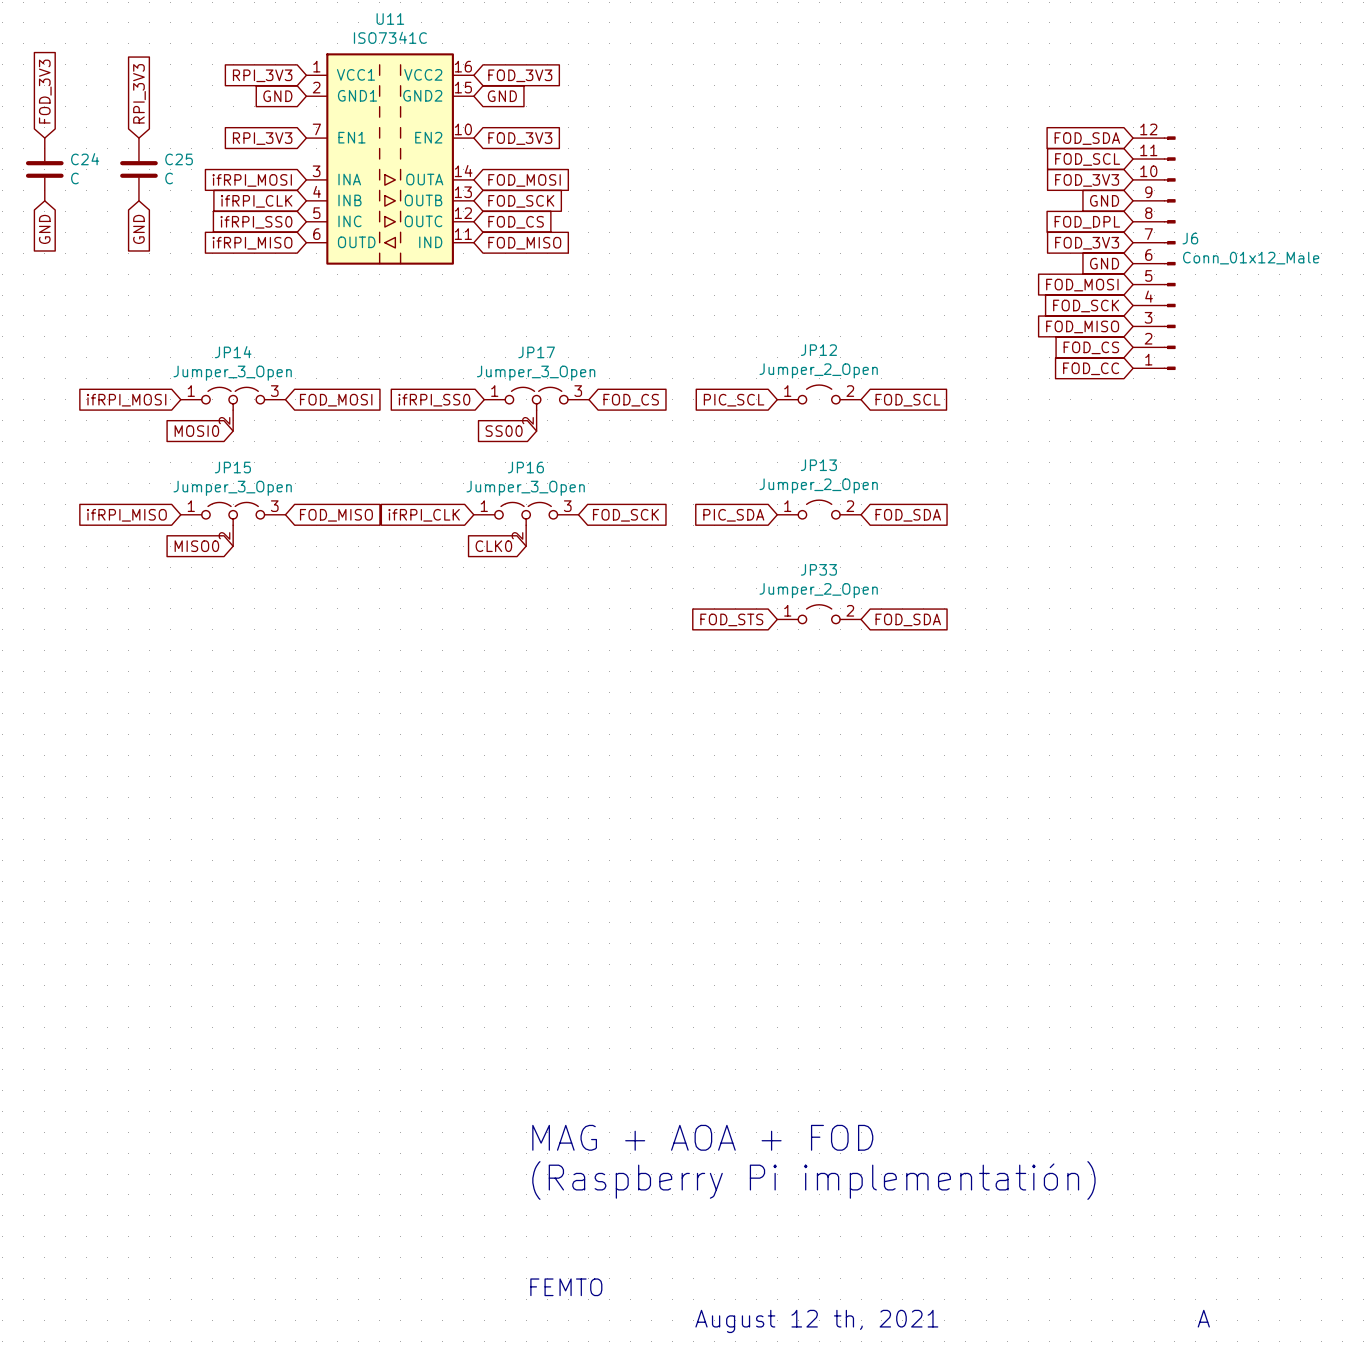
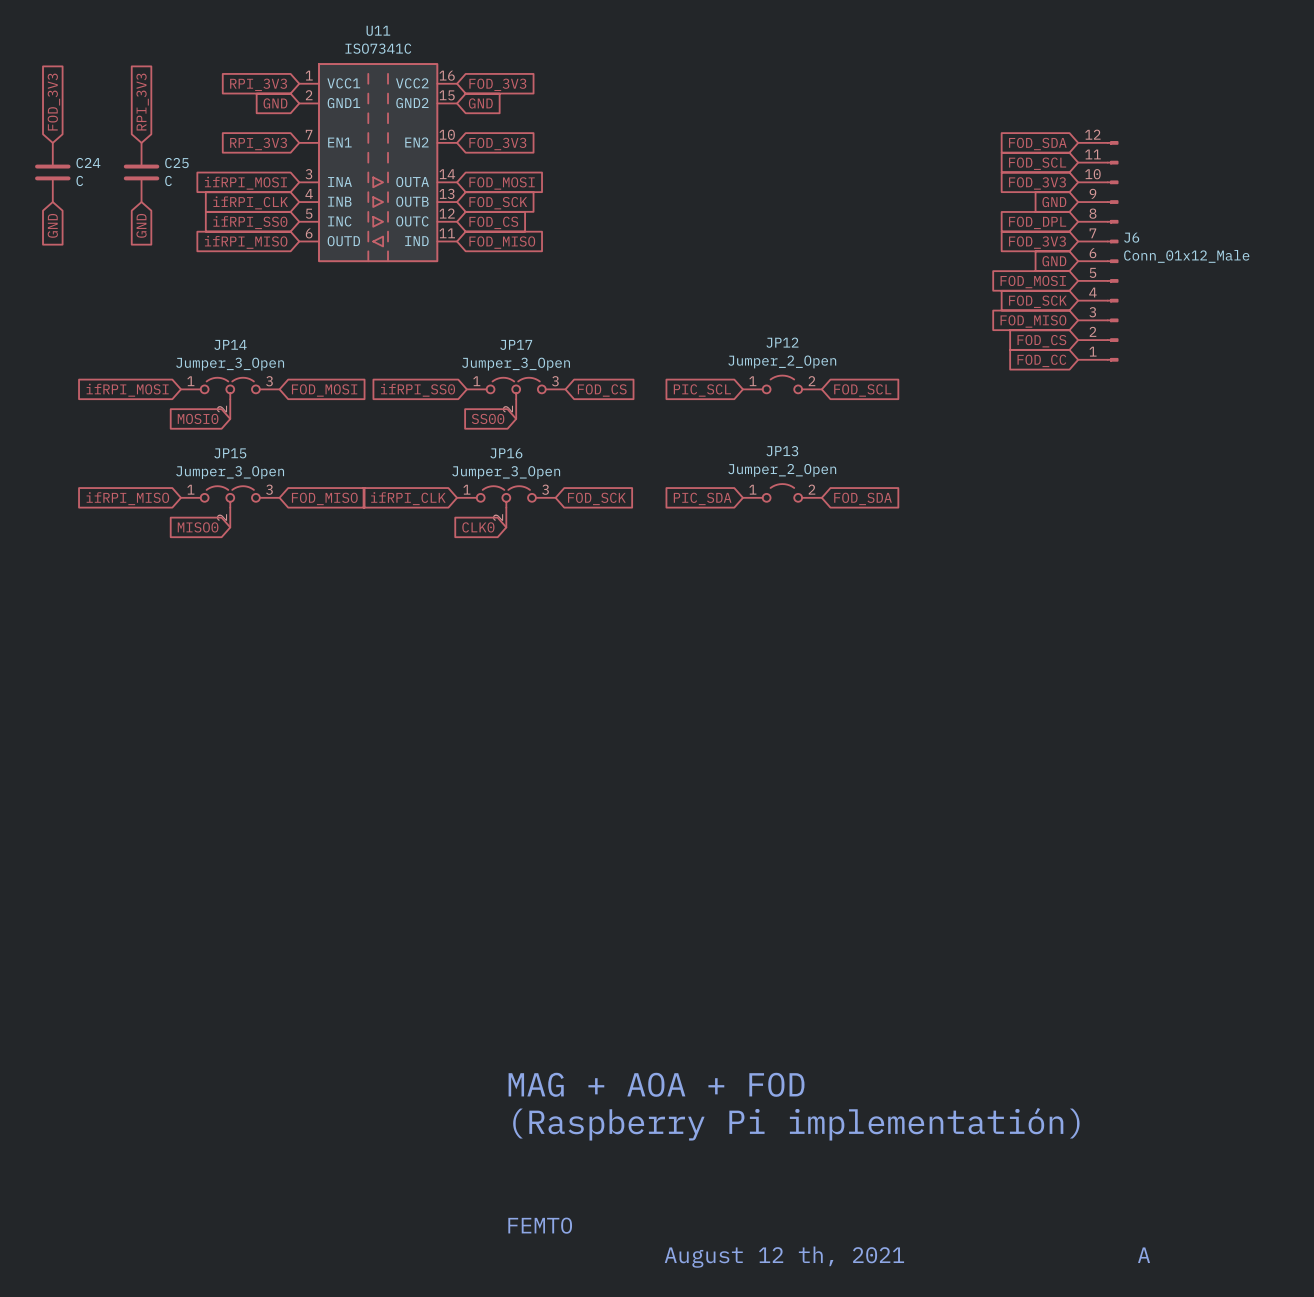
JP33: Jumper_2_Open (819, 614) -> none
global label: FOD_STS (731, 619) -> none
global label: FOD_SDA (908, 619) -> none

